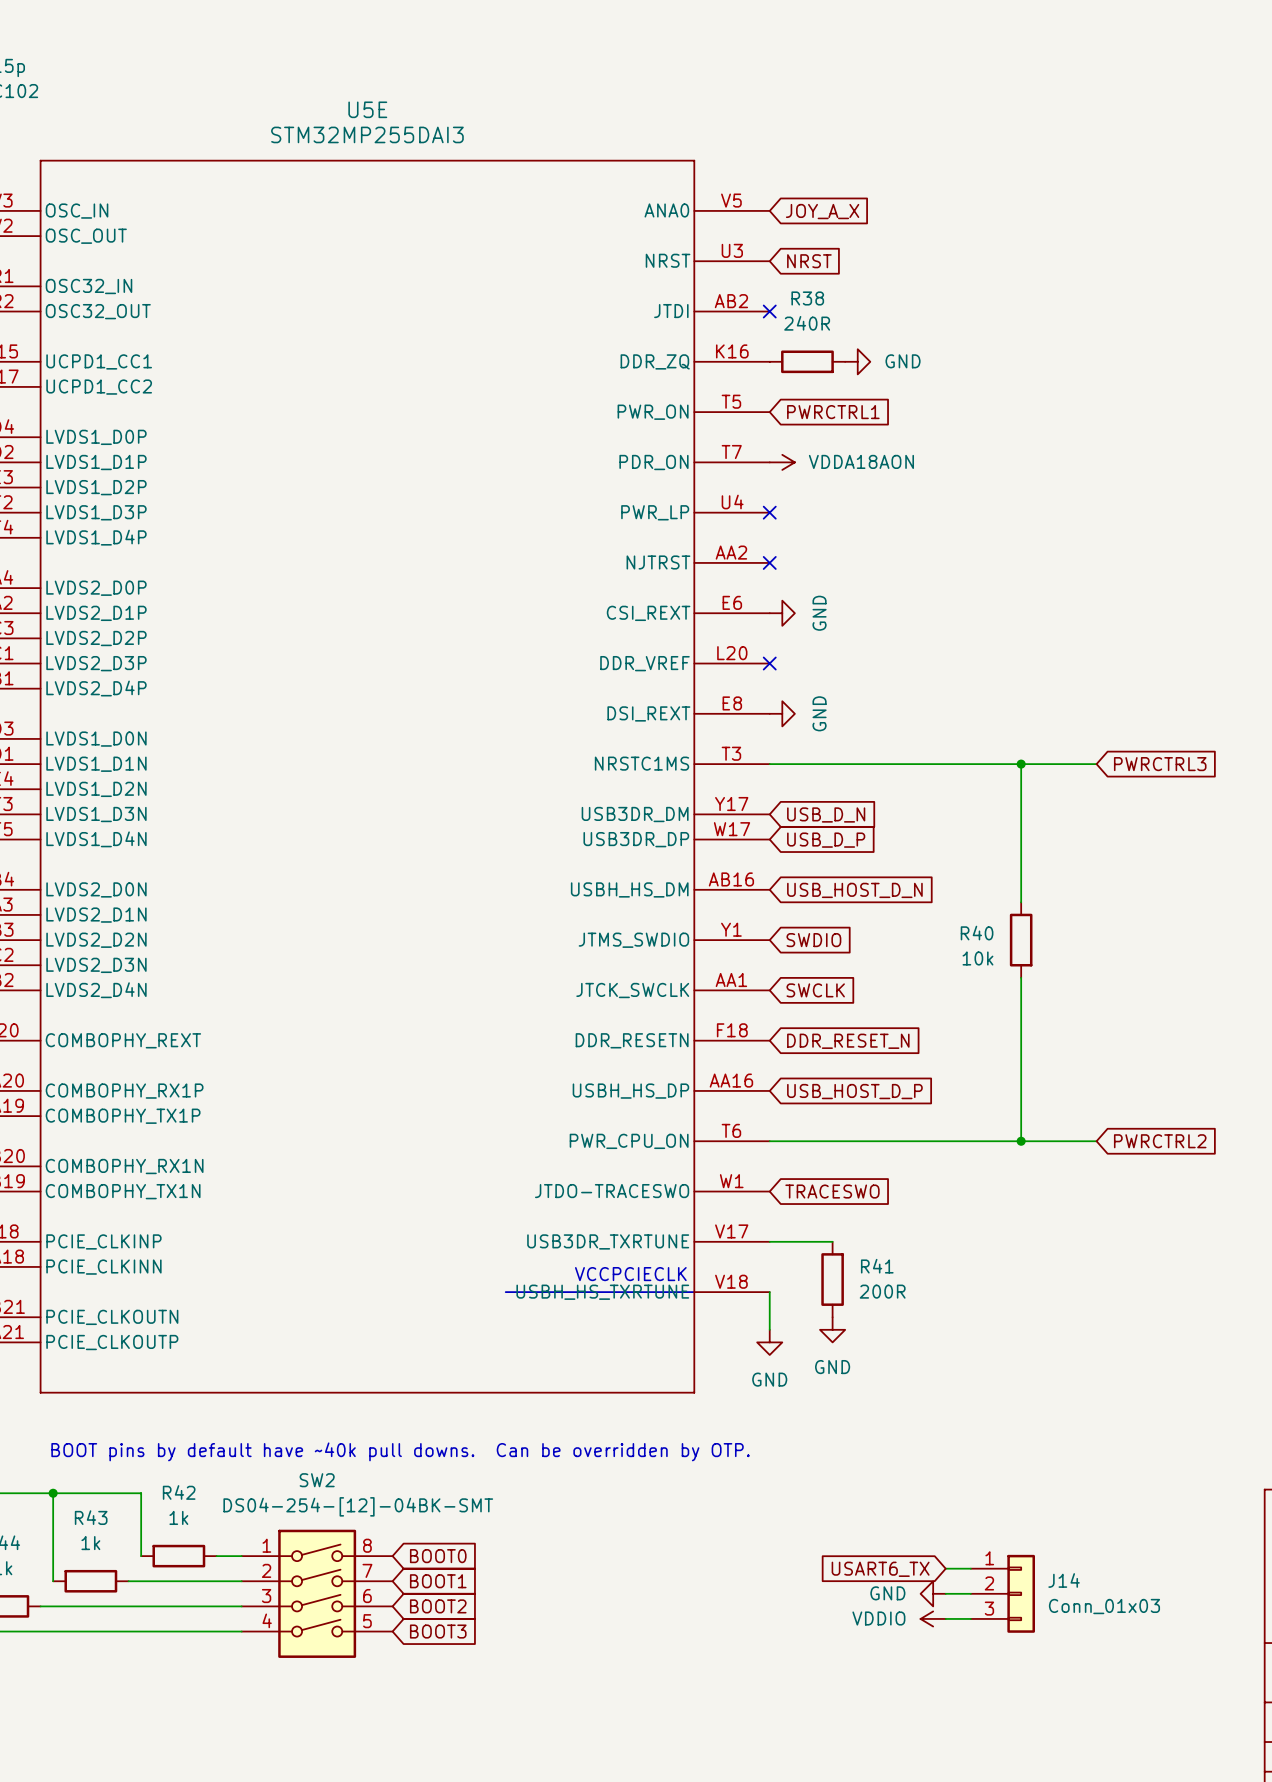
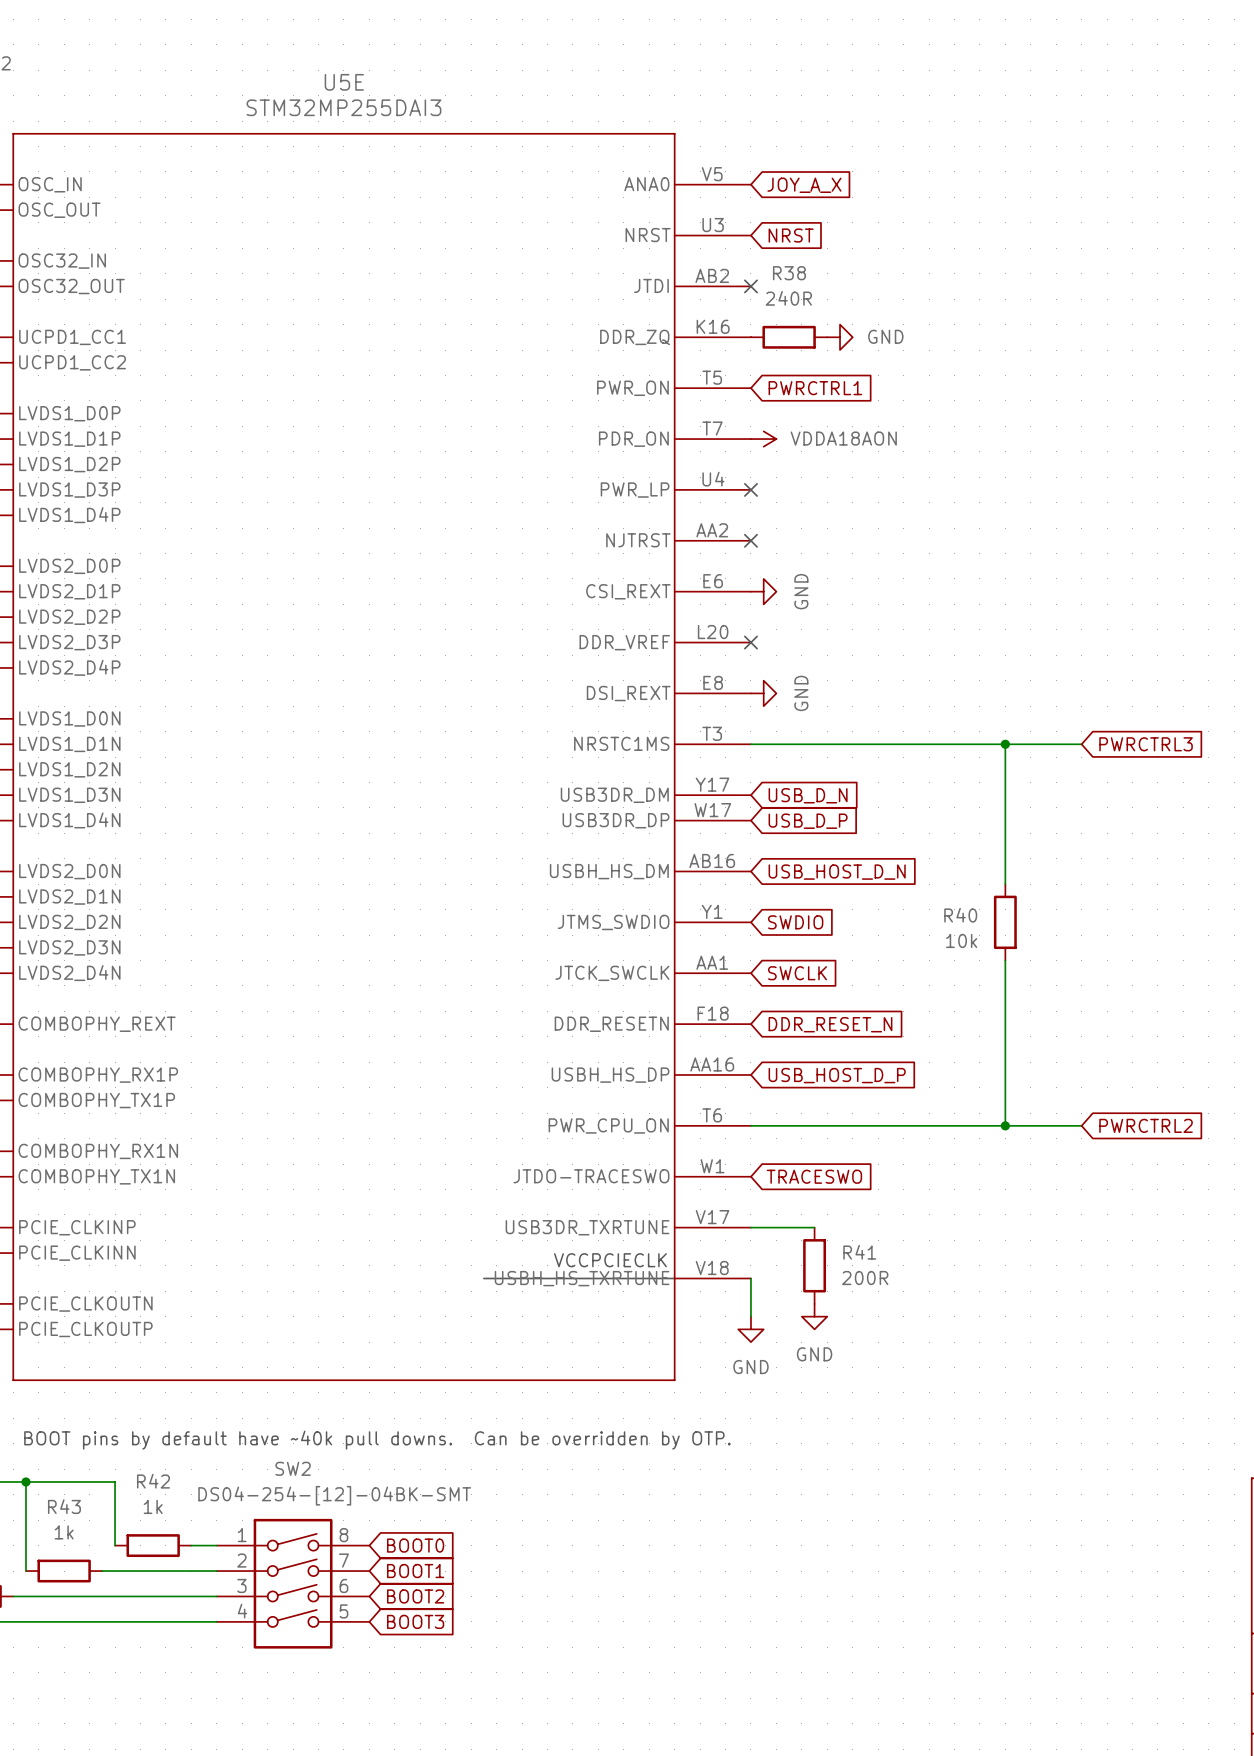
wire: (945, 1568) (970, 1568) -> none
global label: USART6_TX (880, 1569) -> none
power symbol: GND (933, 1593) -> none
wire: (945, 1593) (970, 1593) -> none
J14: Conn_01x03 (1002, 1593) -> none
power symbol: VDDIO (933, 1618) -> none
wire: (945, 1618) (970, 1618) -> none

